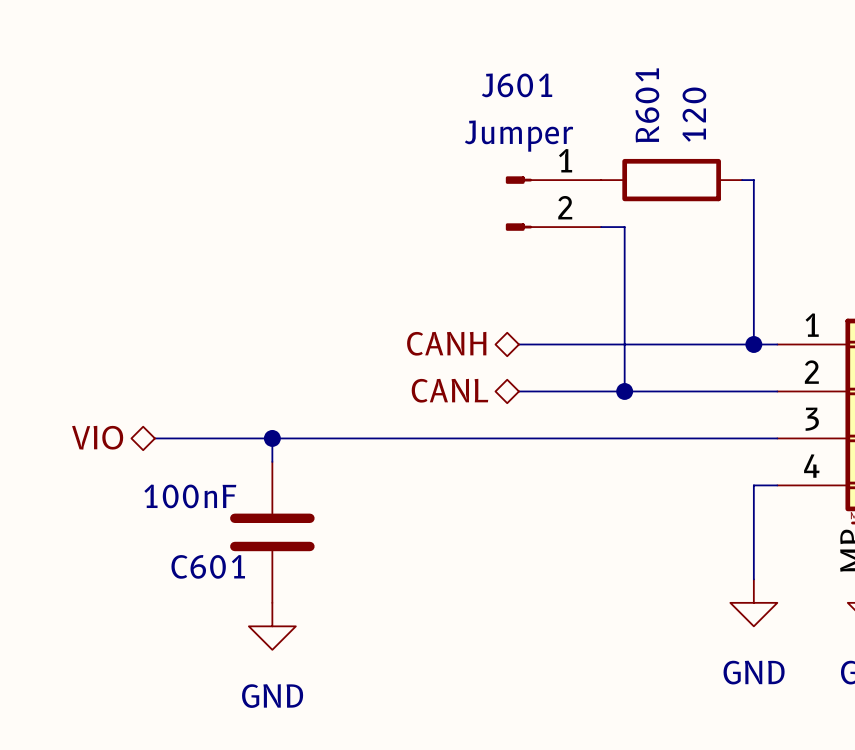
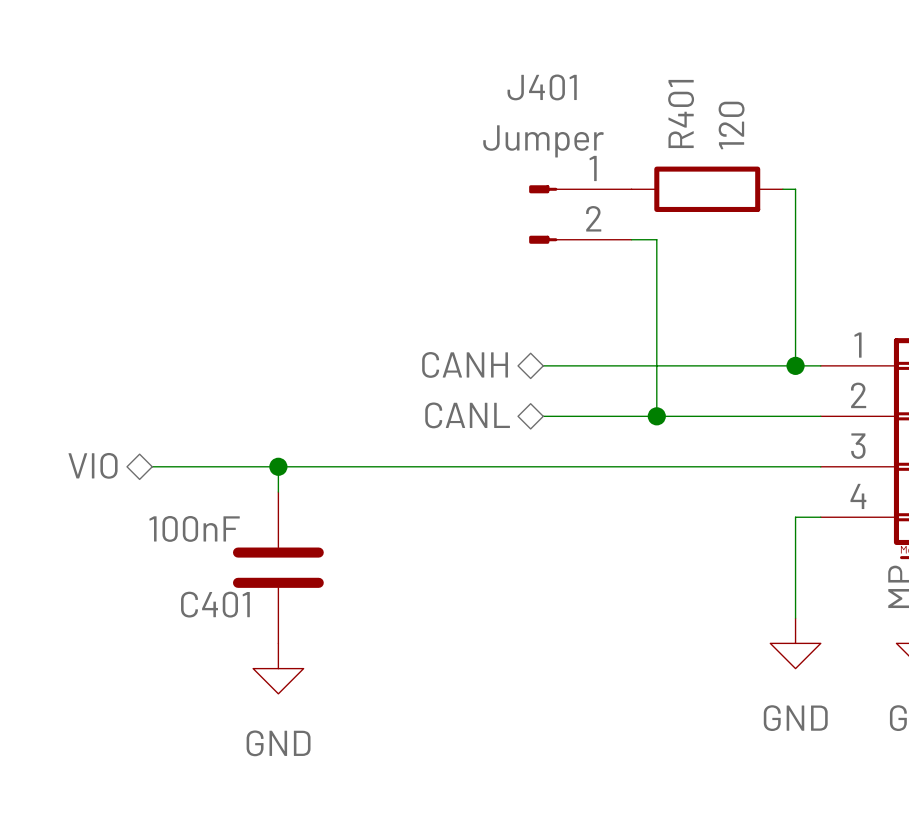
J601 name: J601 (517, 85) -> J401 (542, 87)
R601 name: R601 (647, 105) -> R401 (681, 113)
C601 name: C601 (208, 566) -> C401 (215, 604)

